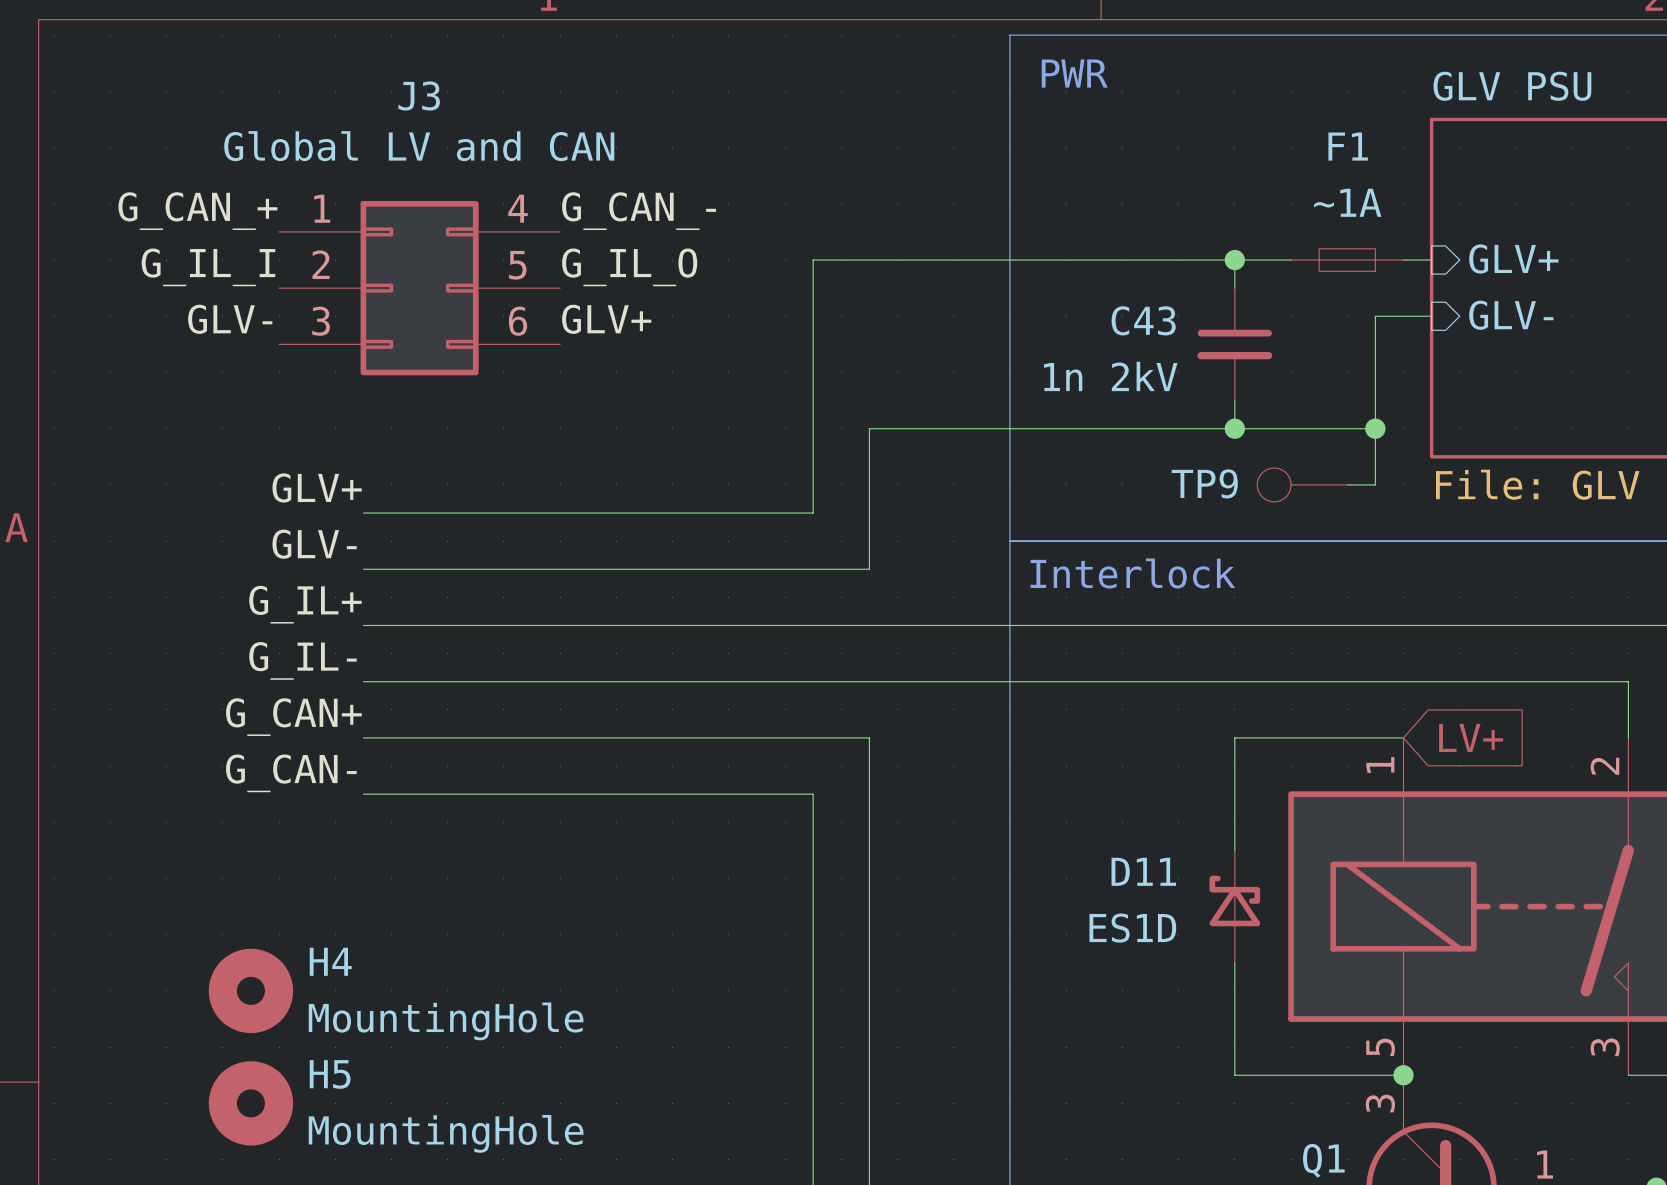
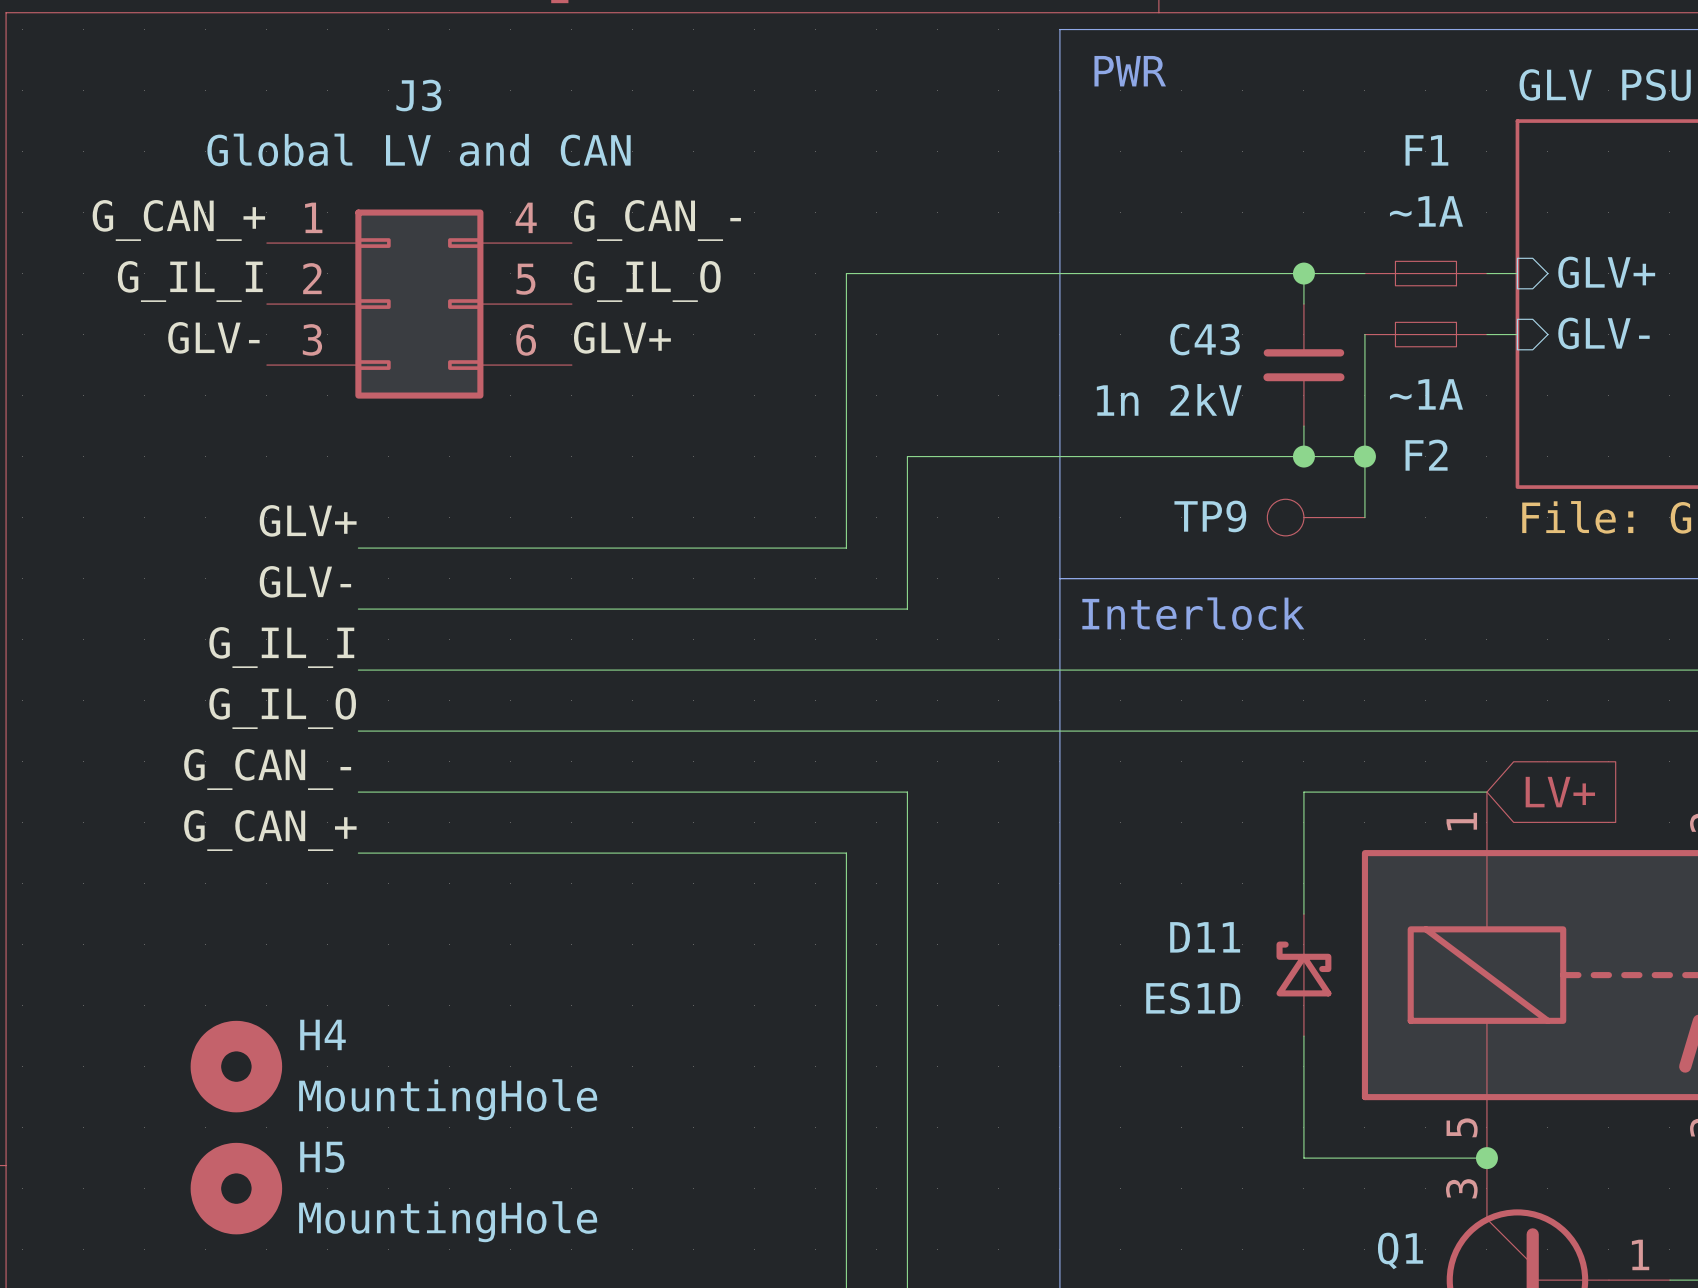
wire: none -> (1364, 334) (1364, 517)
F2: none -> ~1A (1425, 334)
wire: (1403, 316) (1375, 316) (1375, 484) (1347, 484) -> none
wire: (1291, 428) (1375, 428) -> none
junction position: (1375, 428) -> (1364, 456)
TP9 position: (1302, 484) -> (1316, 517)
label: G_IL+ (305, 604) -> G_IL_I (281, 647)
label: G_IL- (302, 660) -> G_IL_O (282, 708)
label: G_CAN+ (293, 717) -> G_CAN_- (267, 769)
label: G_CAN- (291, 773) -> G_CAN_+ (270, 830)

